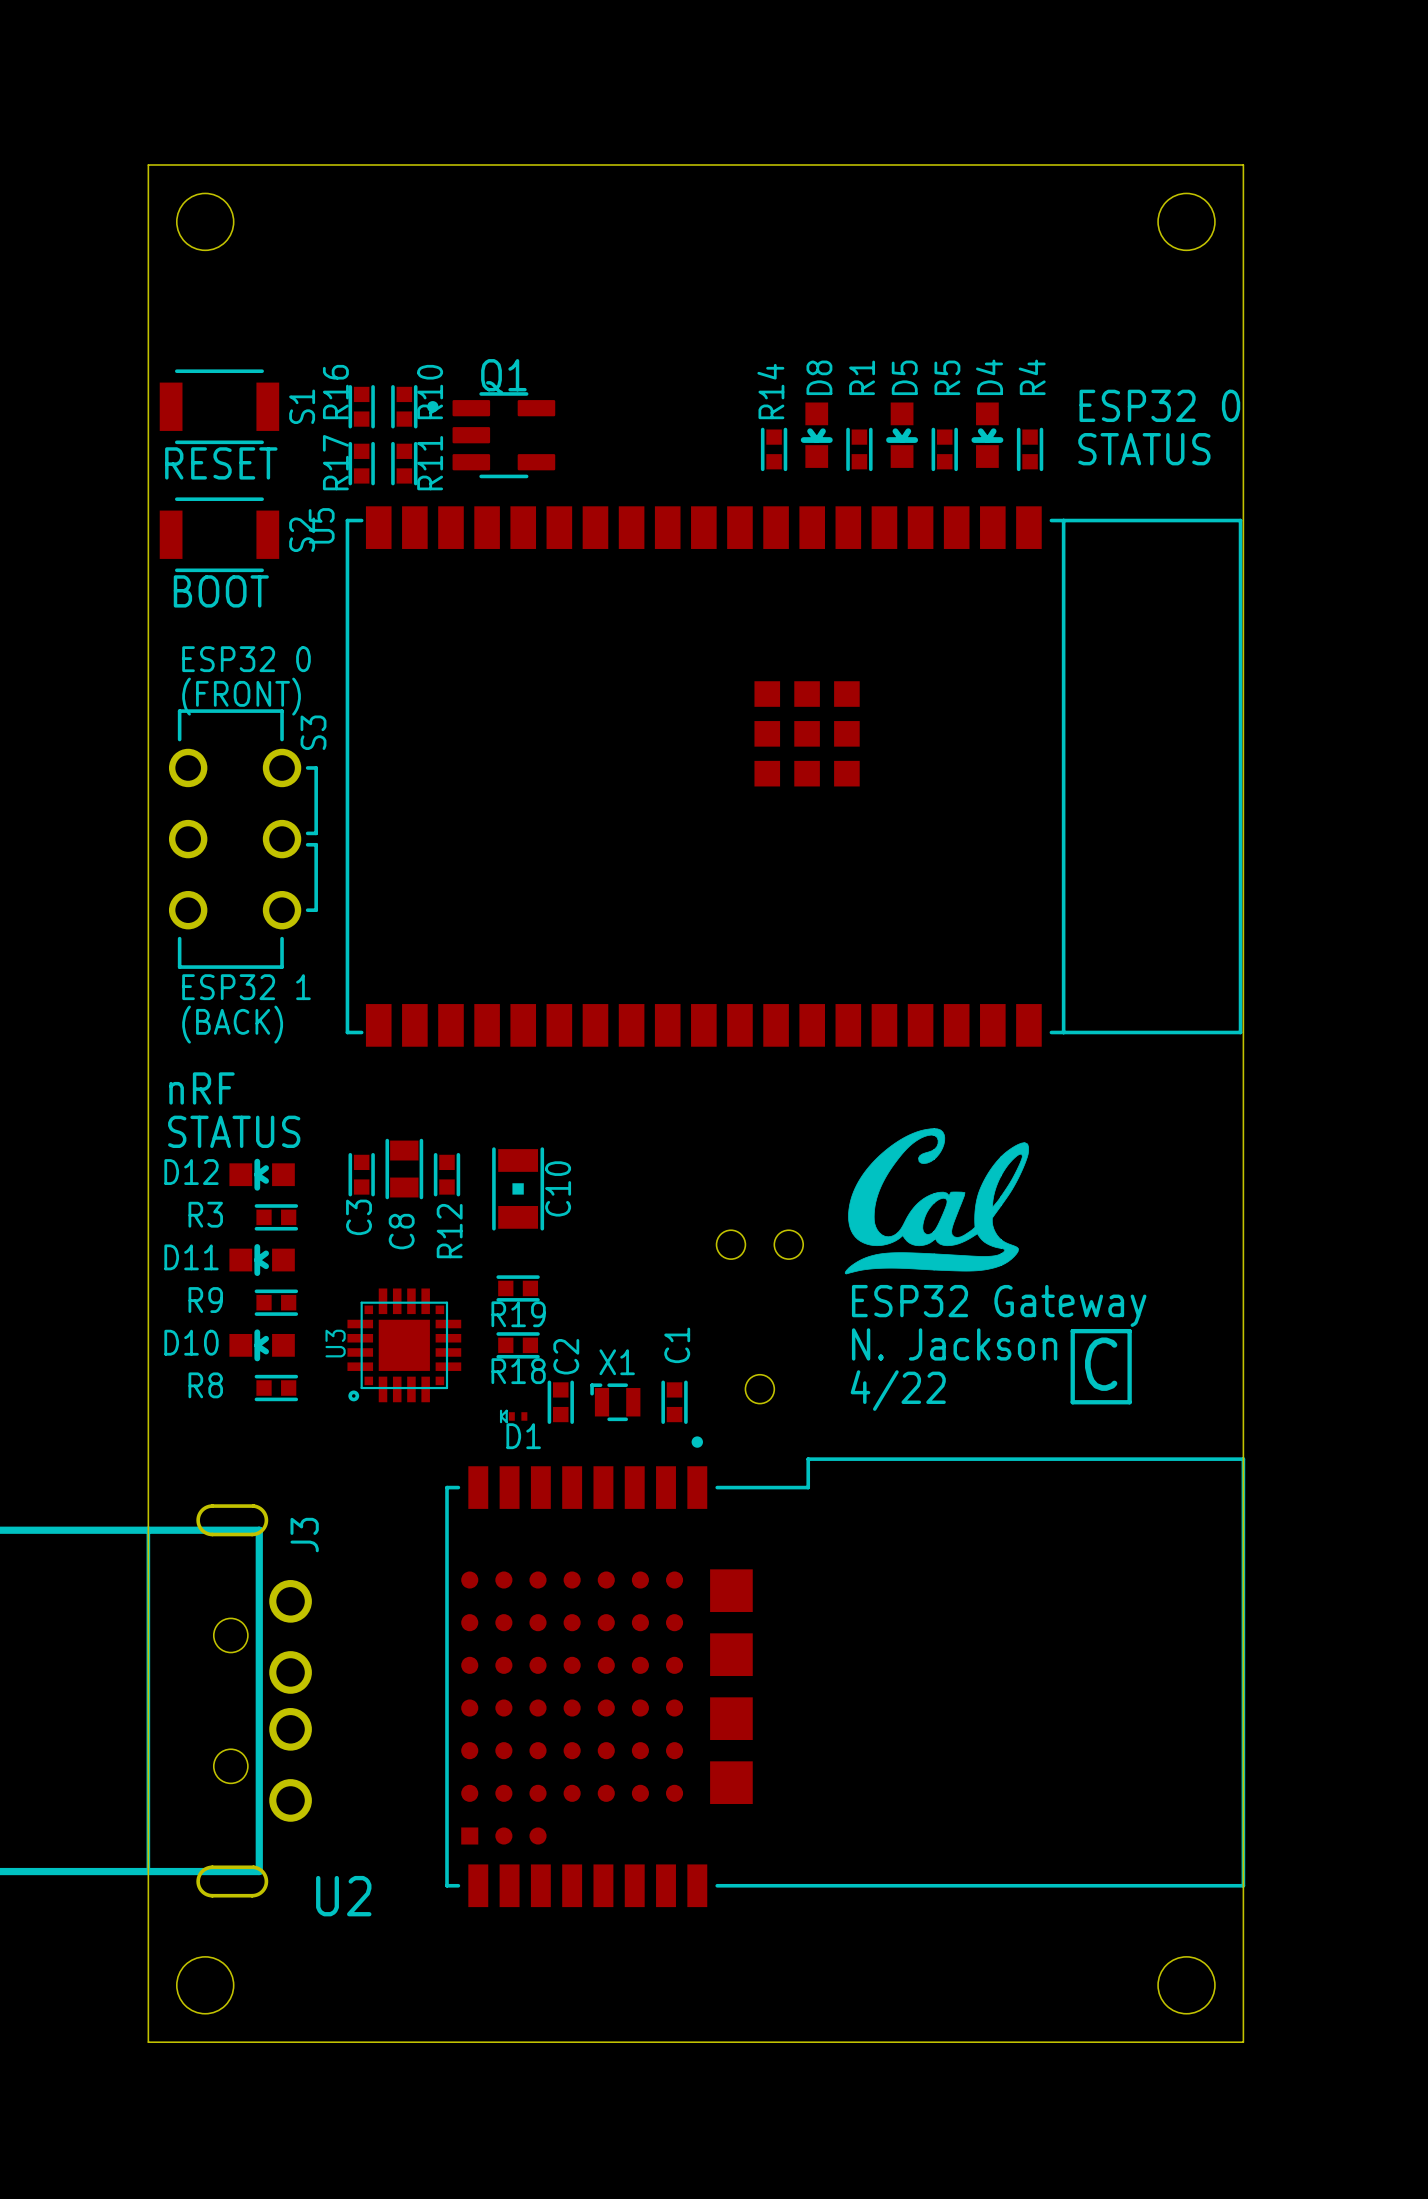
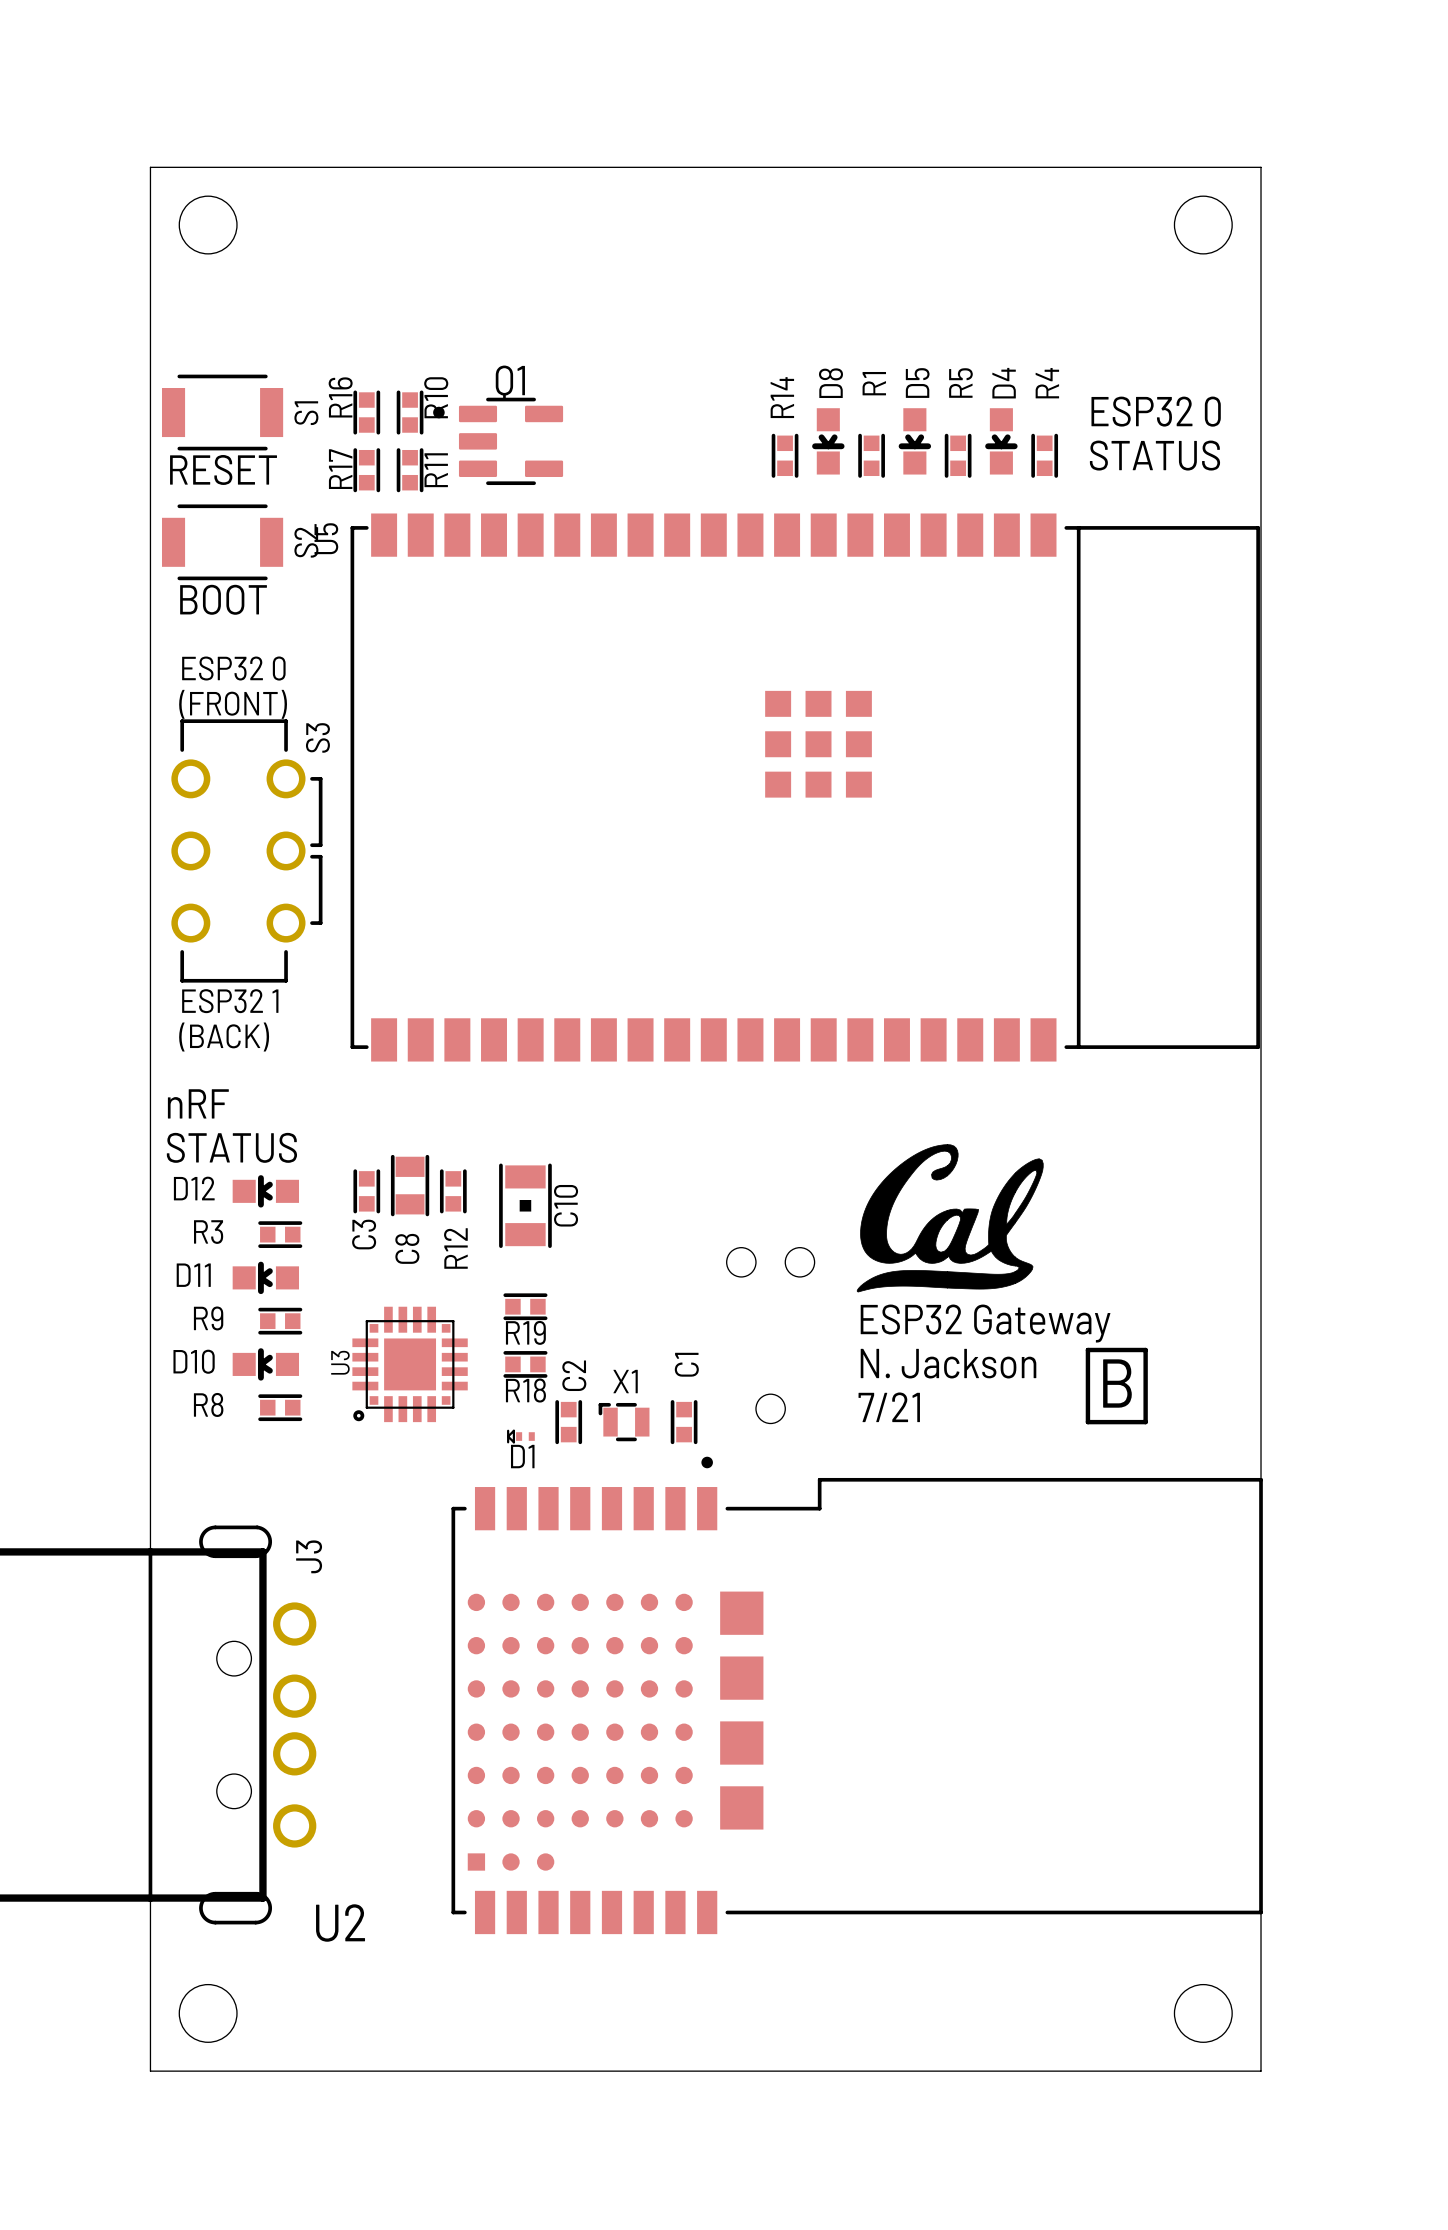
text: C (1101, 1364) -> B (1117, 1383)
text: 4/22 (898, 1390) -> 7/21 (889, 1407)

